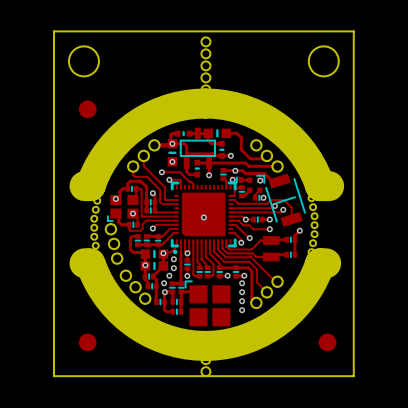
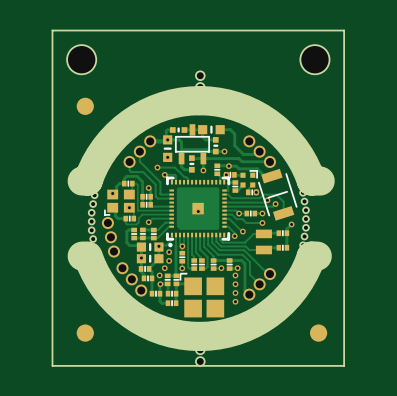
hole: (205, 41) -> none
hole: (205, 53) -> none
hole: (205, 65) -> none
via: (260, 180) -> none

